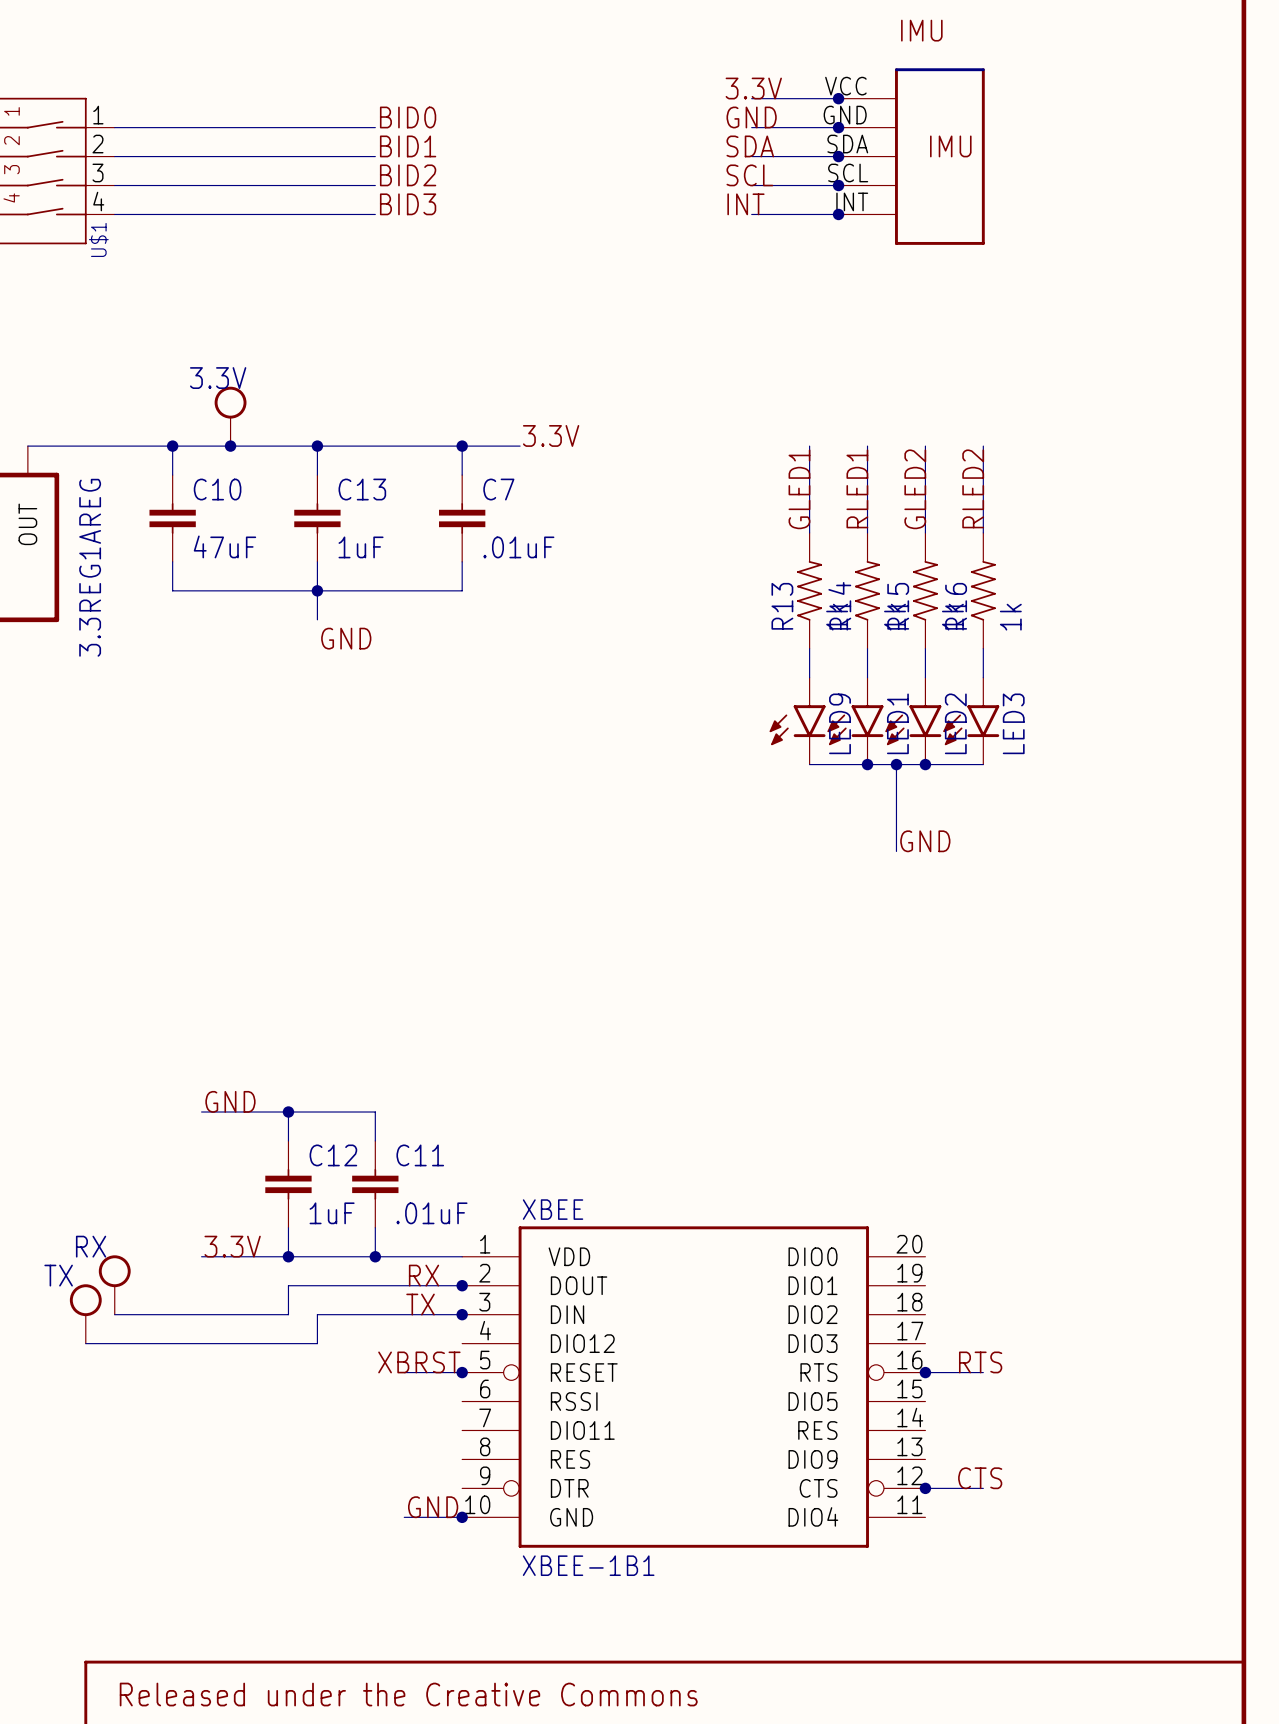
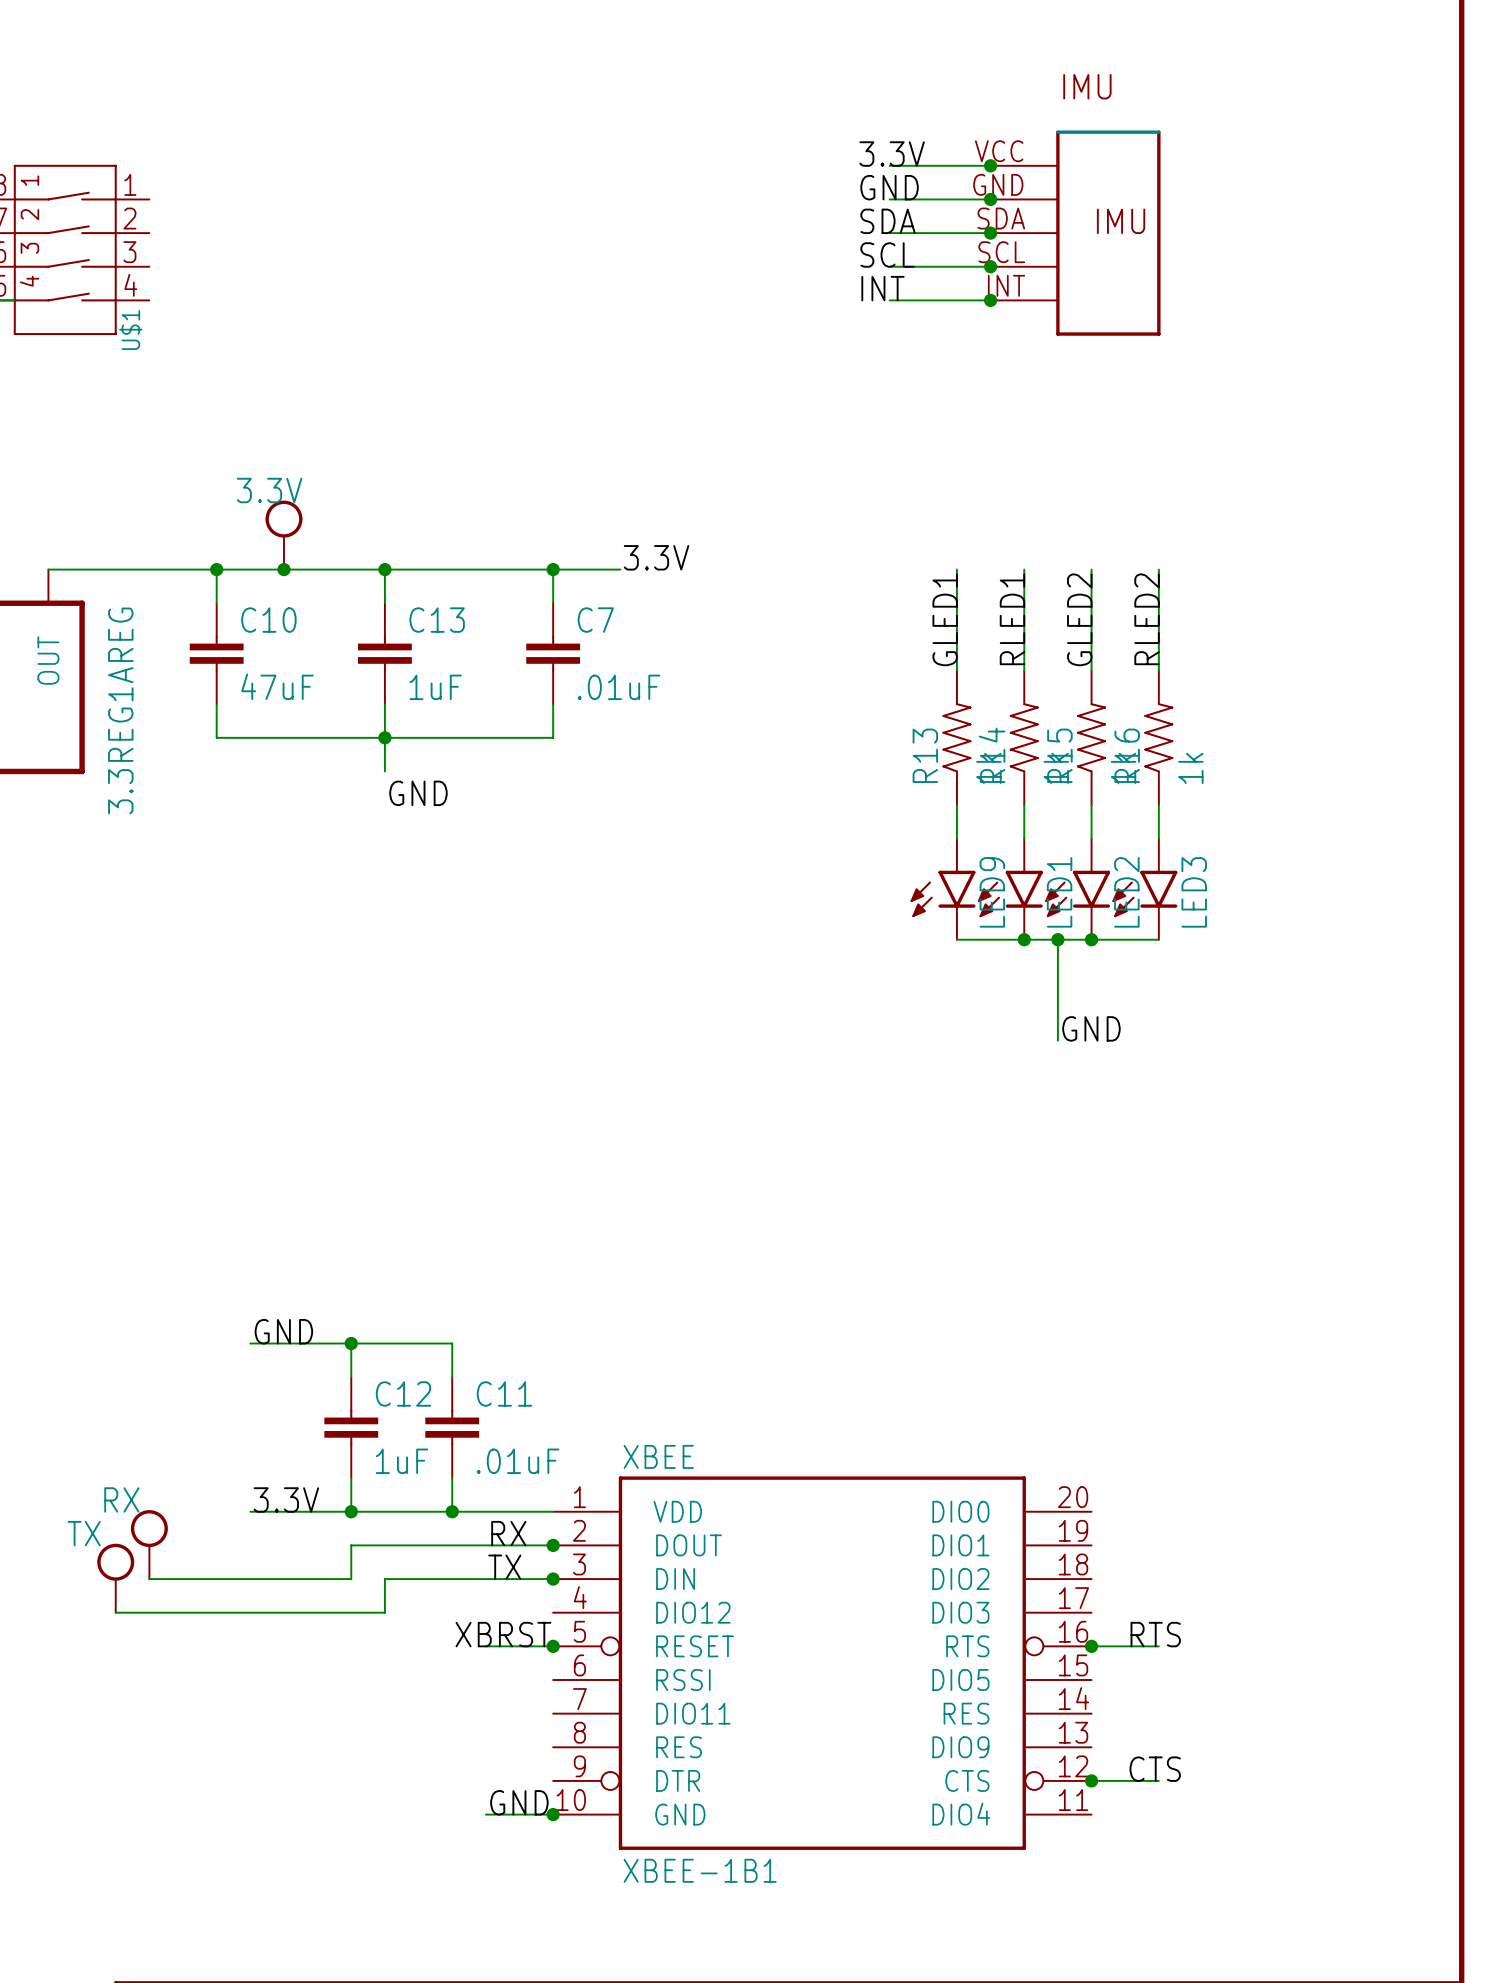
label: BID0 (408, 117) -> none
wire: (114, 127) (375, 127) -> none
label: BID1 (408, 146) -> none
wire: (114, 156) (375, 156) -> none
label: BID2 (408, 175) -> none
wire: (114, 185) (375, 185) -> none
label: BID3 (408, 204) -> none
wire: (114, 214) (375, 214) -> none

